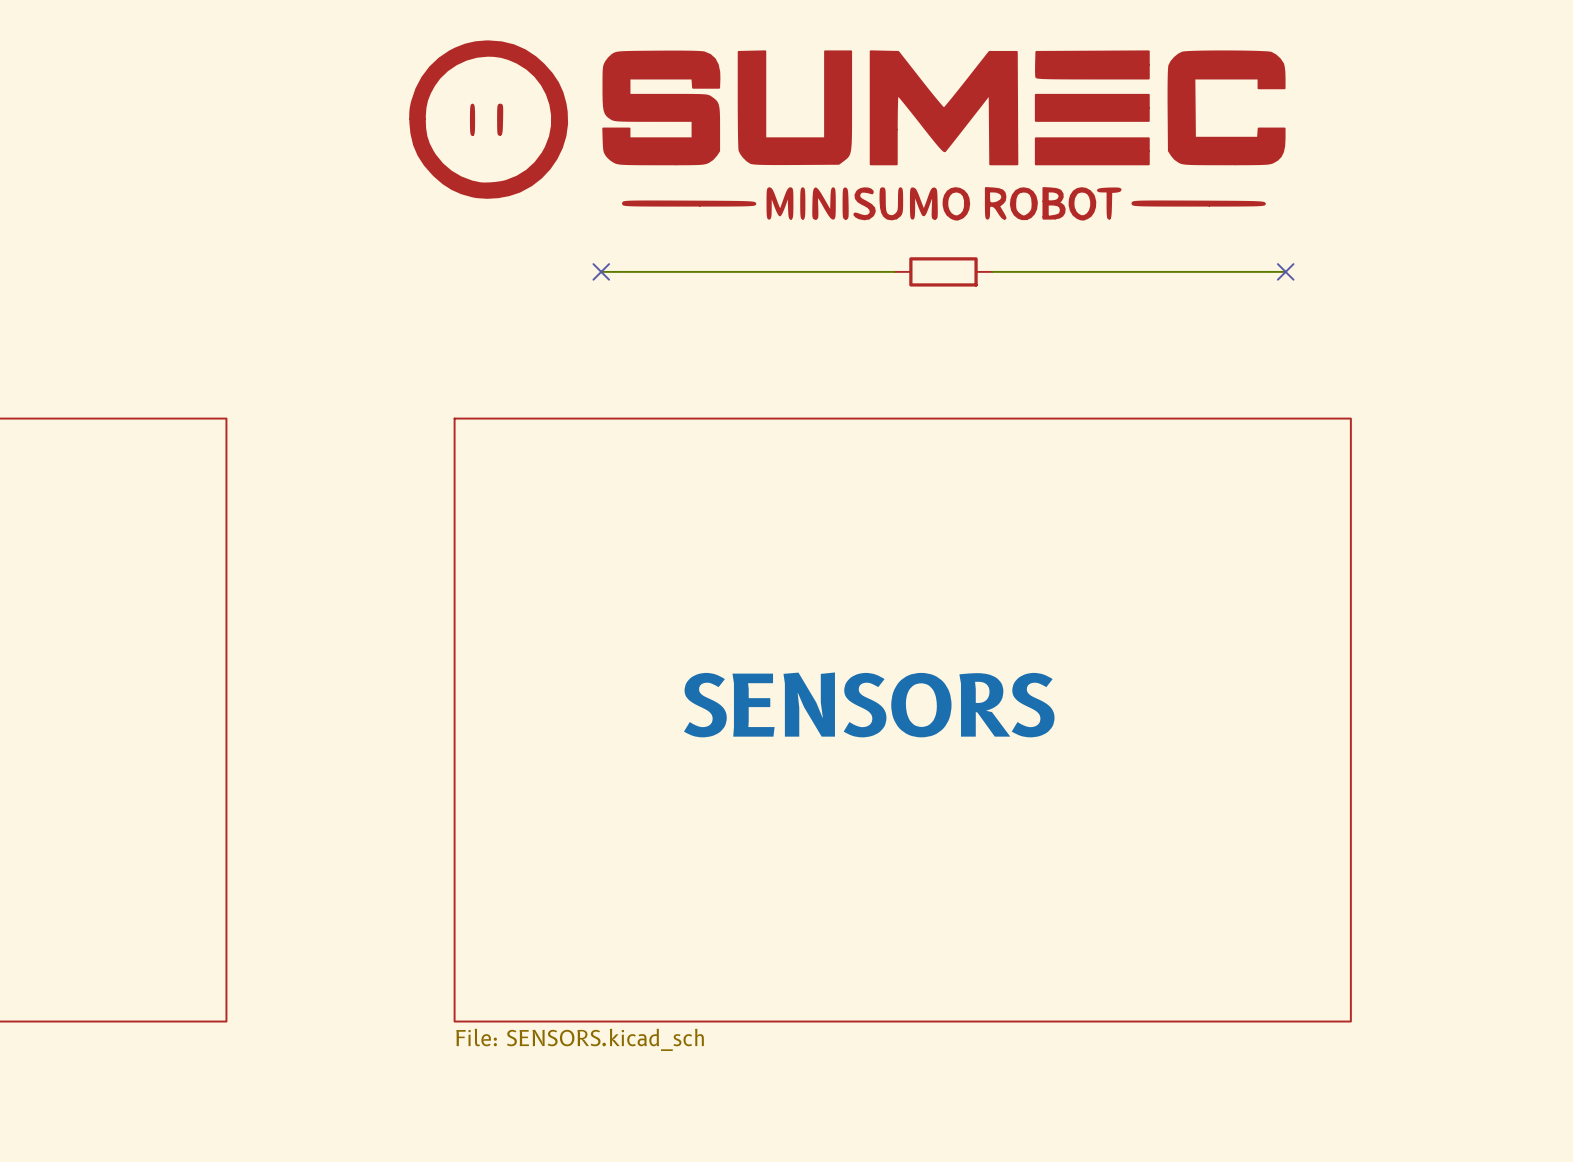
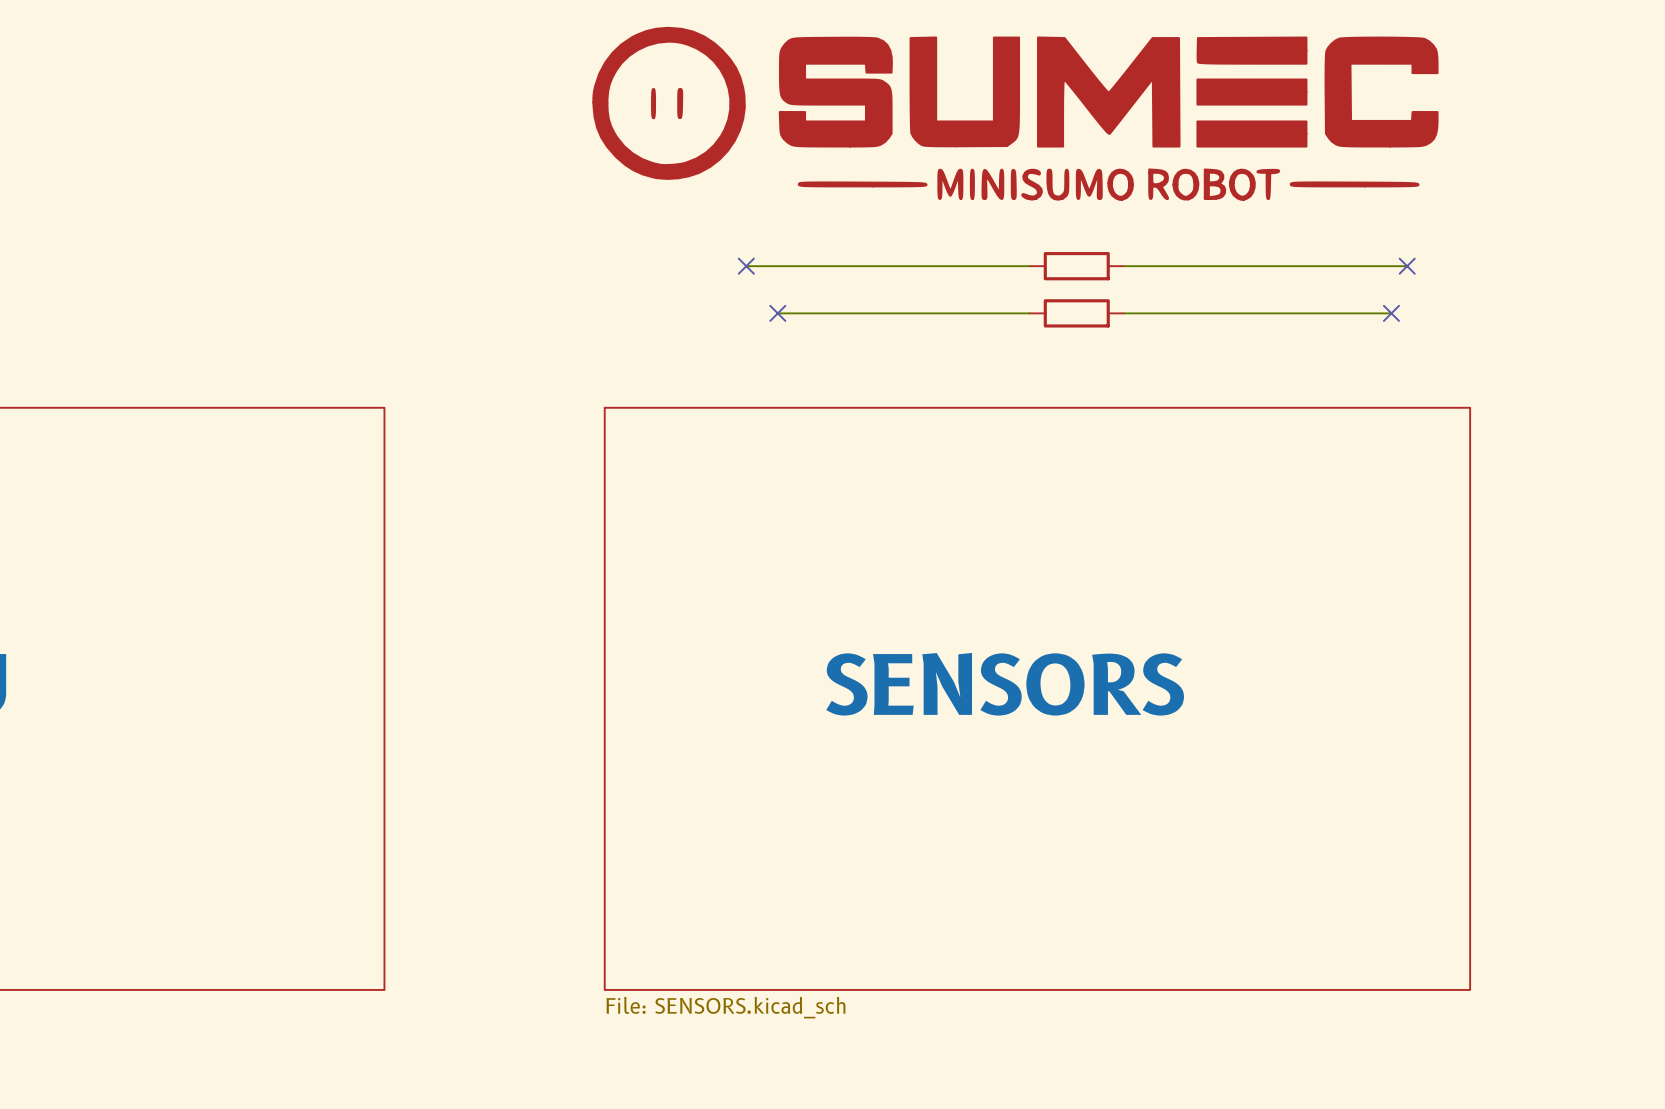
power symbol position: (847, 130) -> (1015, 113)
wire: none -> (777, 313) (1029, 313)
no-connect mark: none -> (777, 313)
part: none -> (1076, 313)
wire: none -> (1123, 313) (1391, 313)
no-connect mark: none -> (1391, 313)

